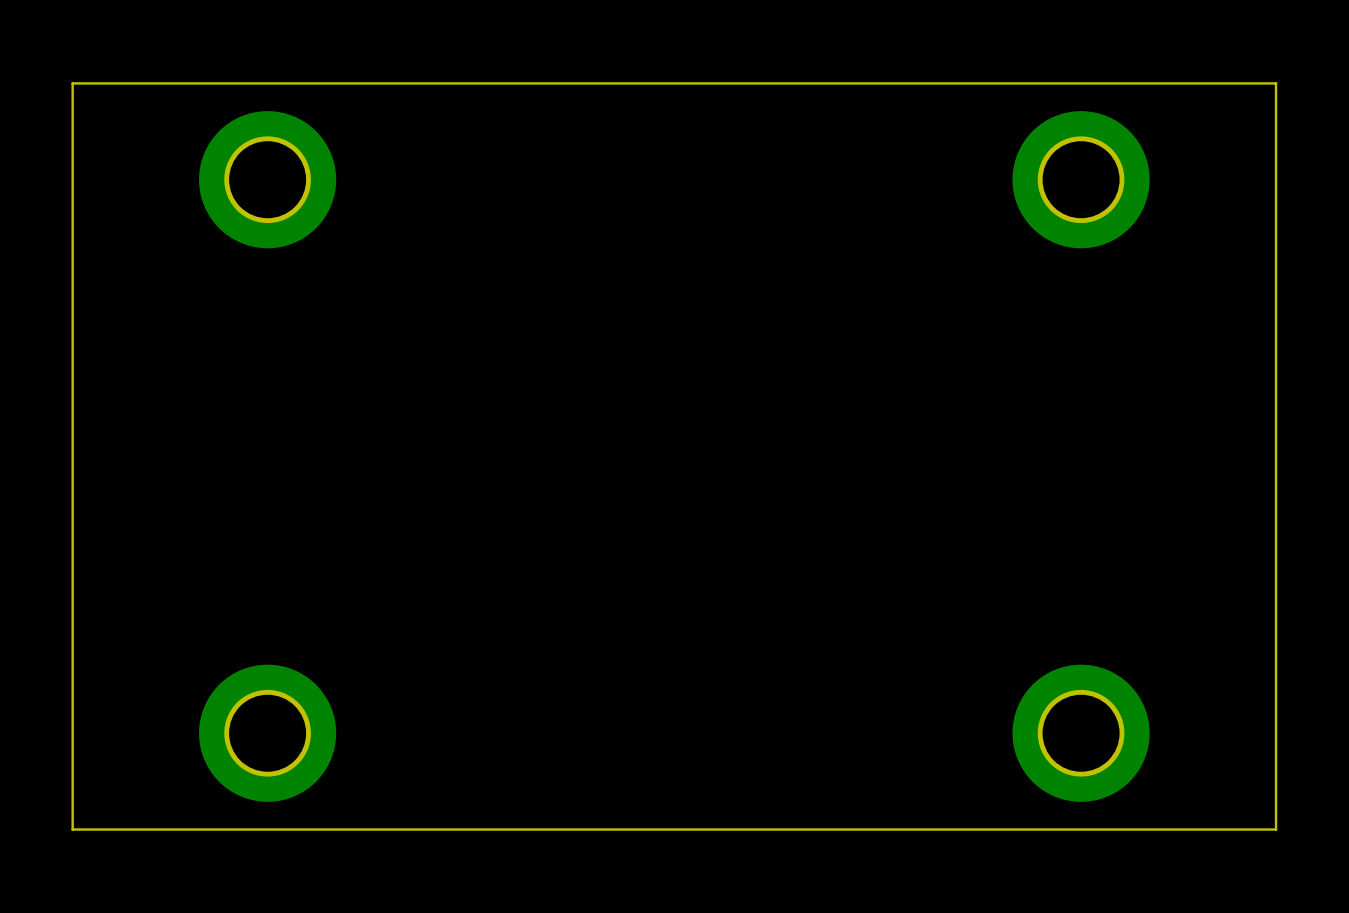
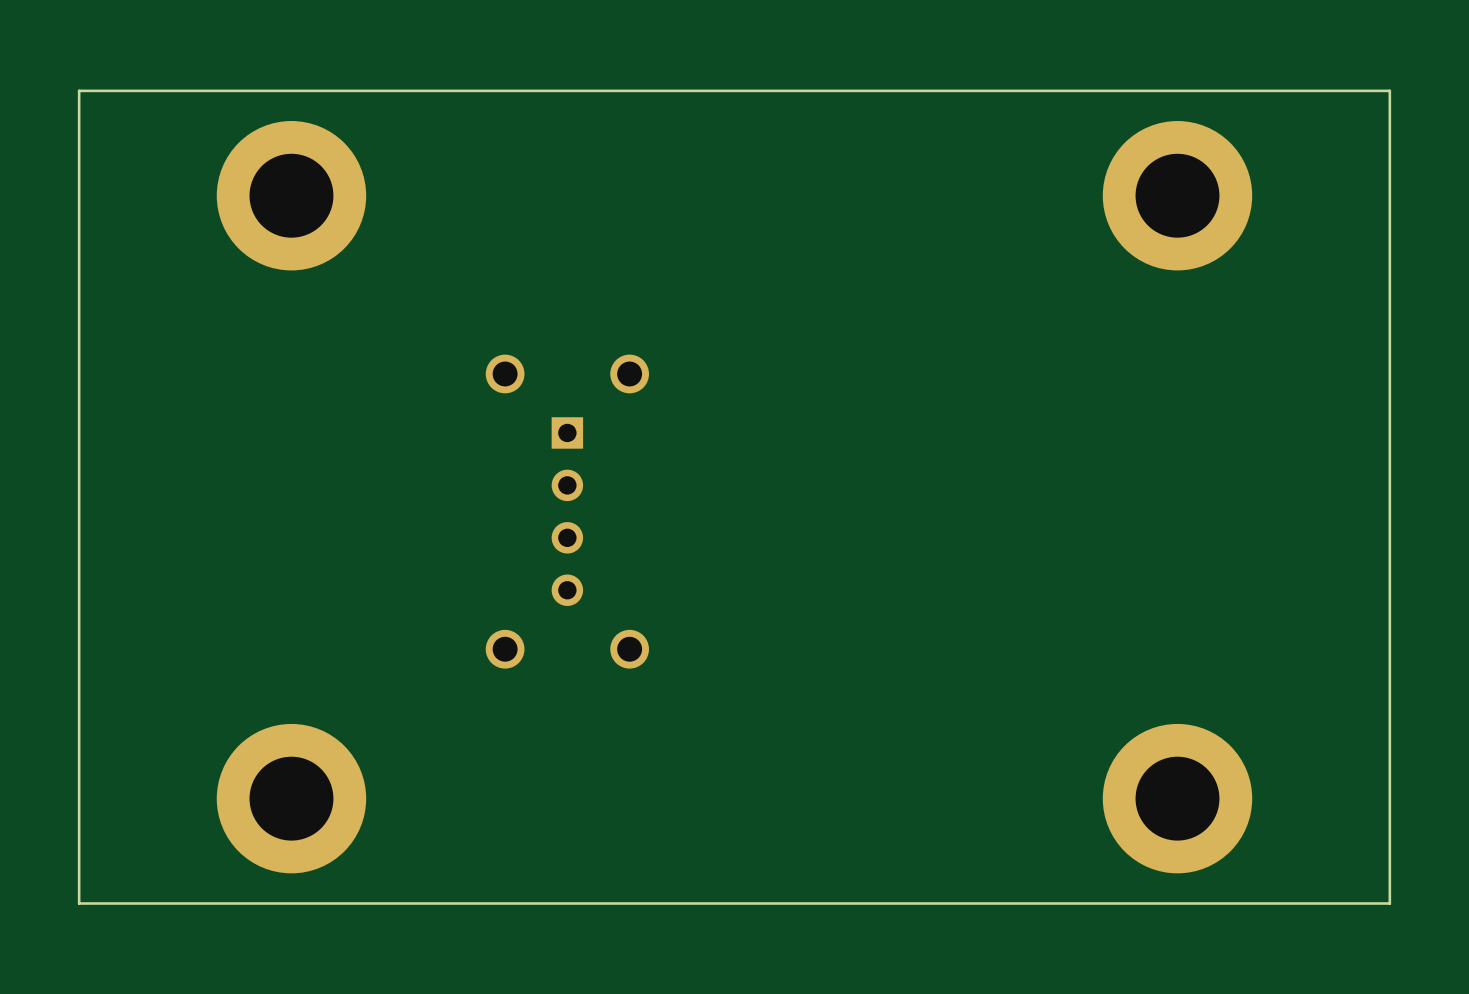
part: none -> (567, 511)

